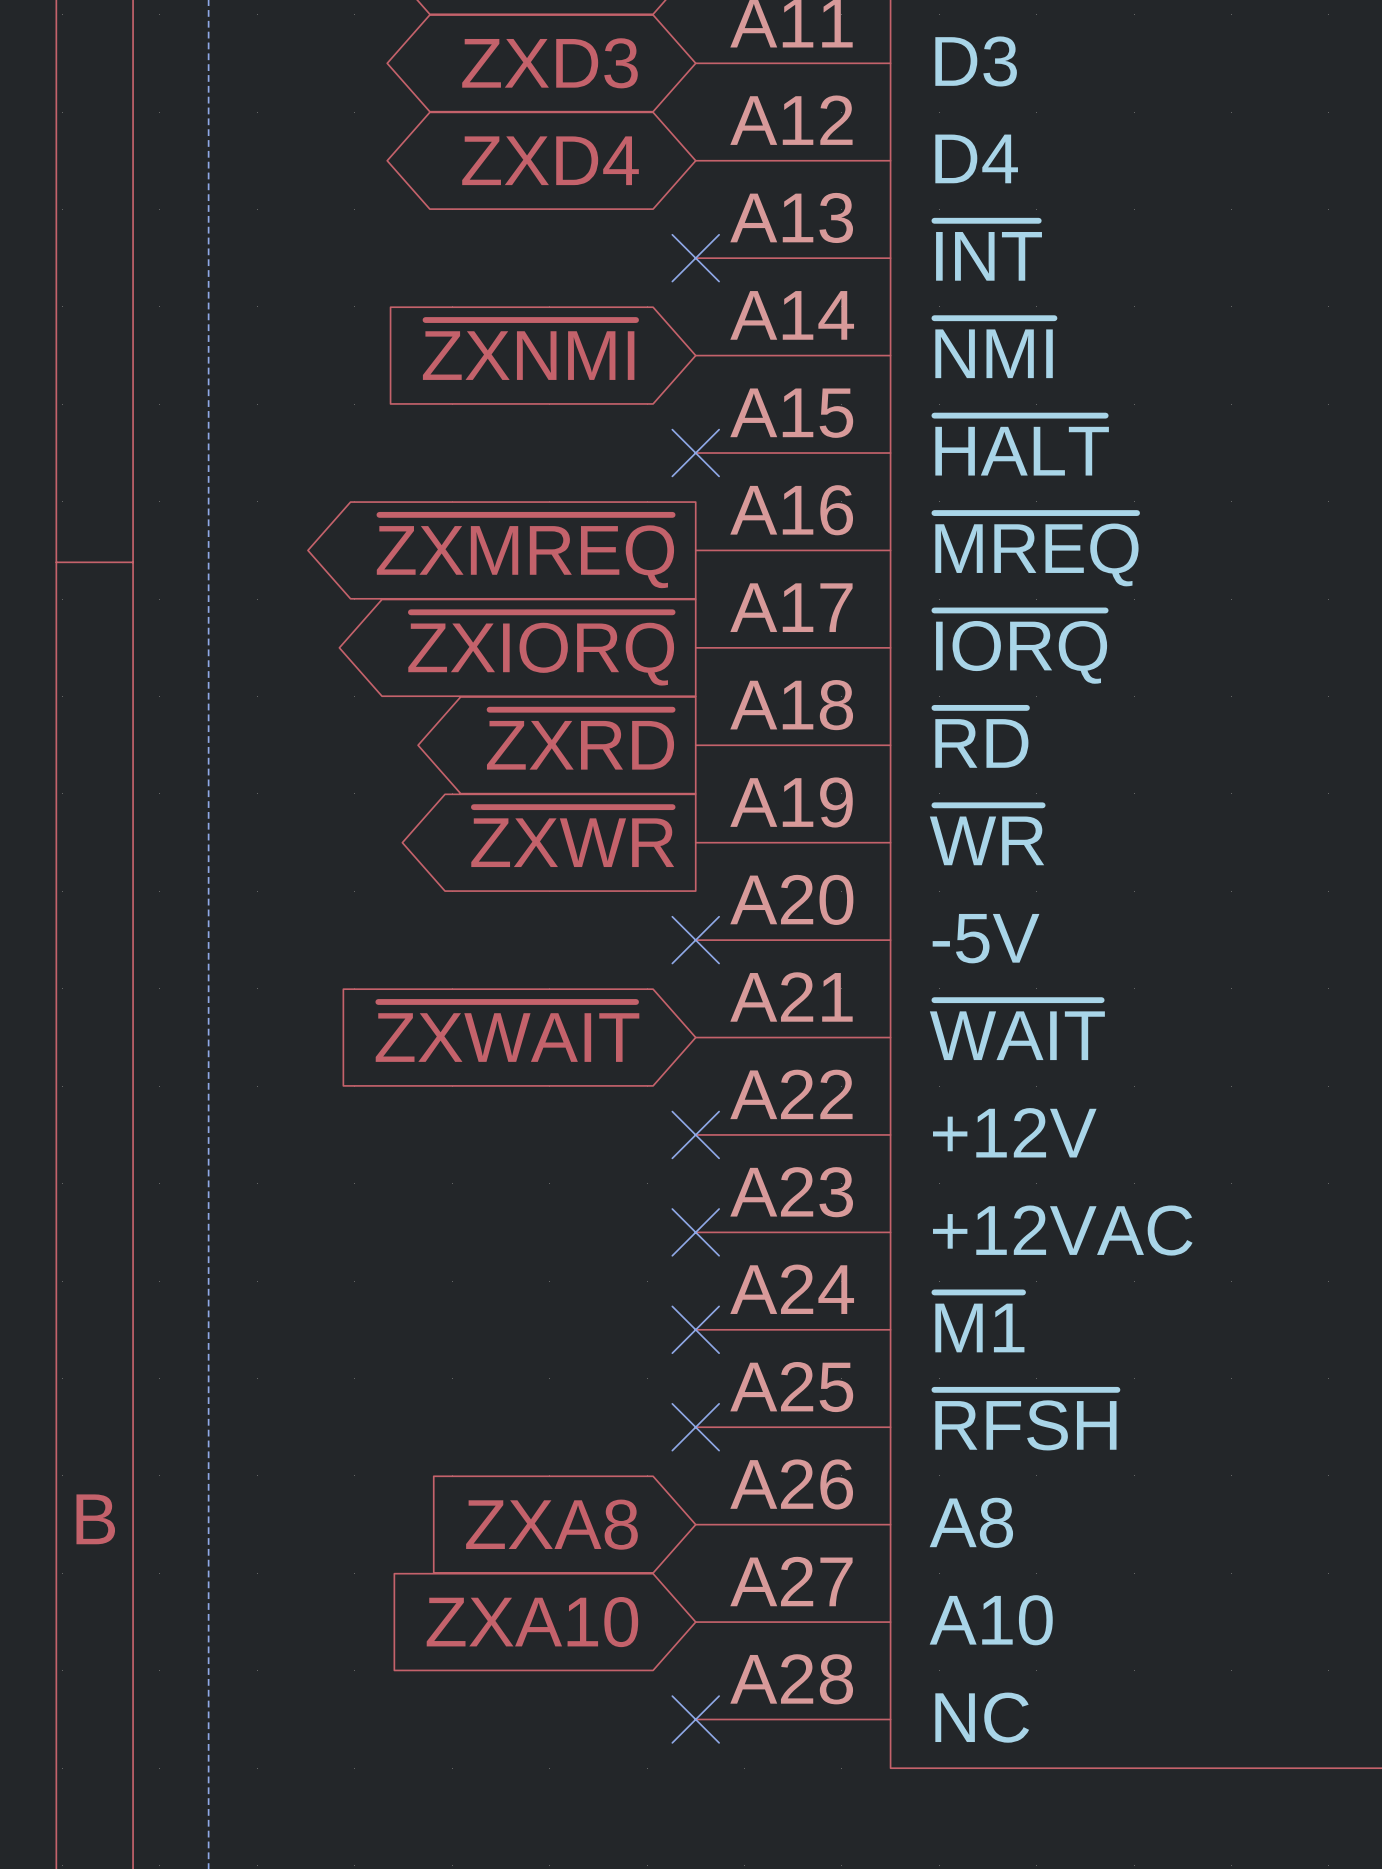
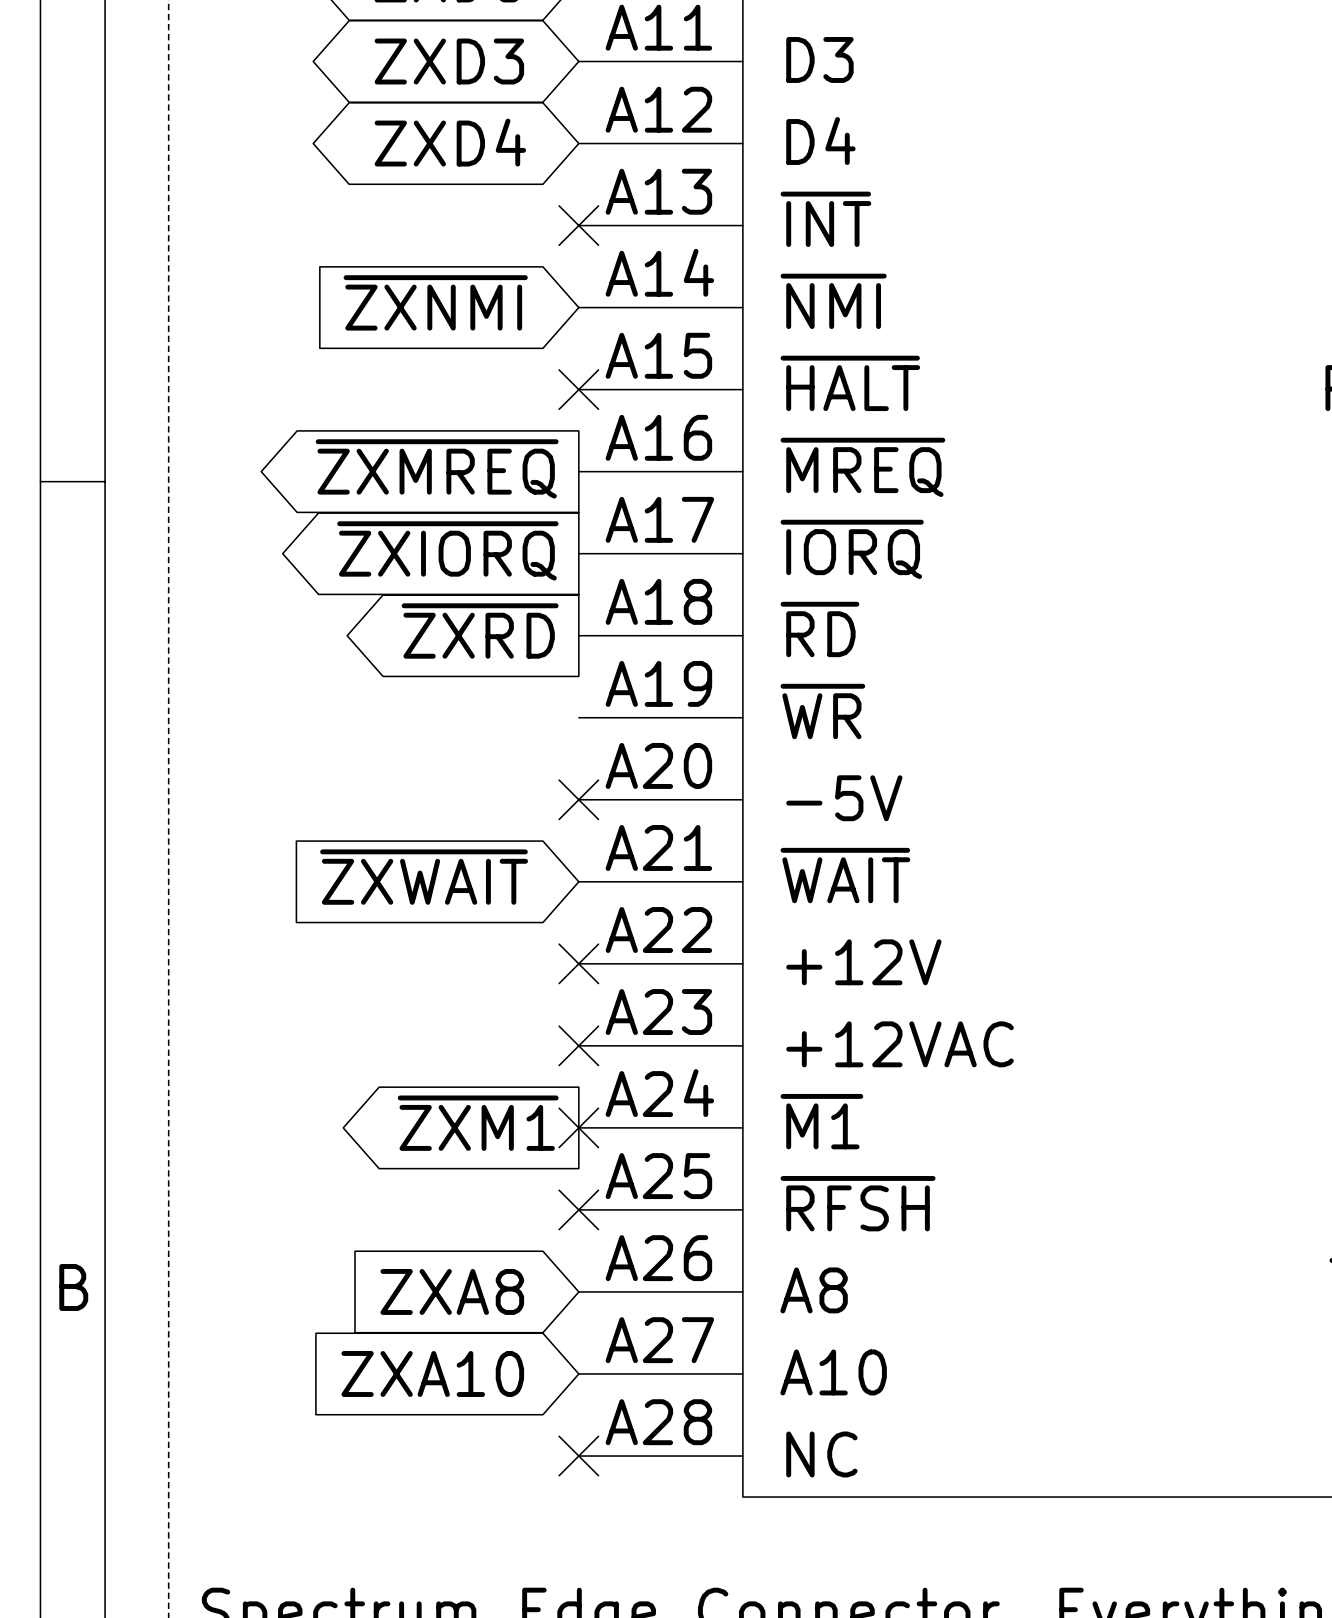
global label: ~{ZXWR} (572, 837) -> none
global label: none -> ~{ZXM1} (478, 1123)

